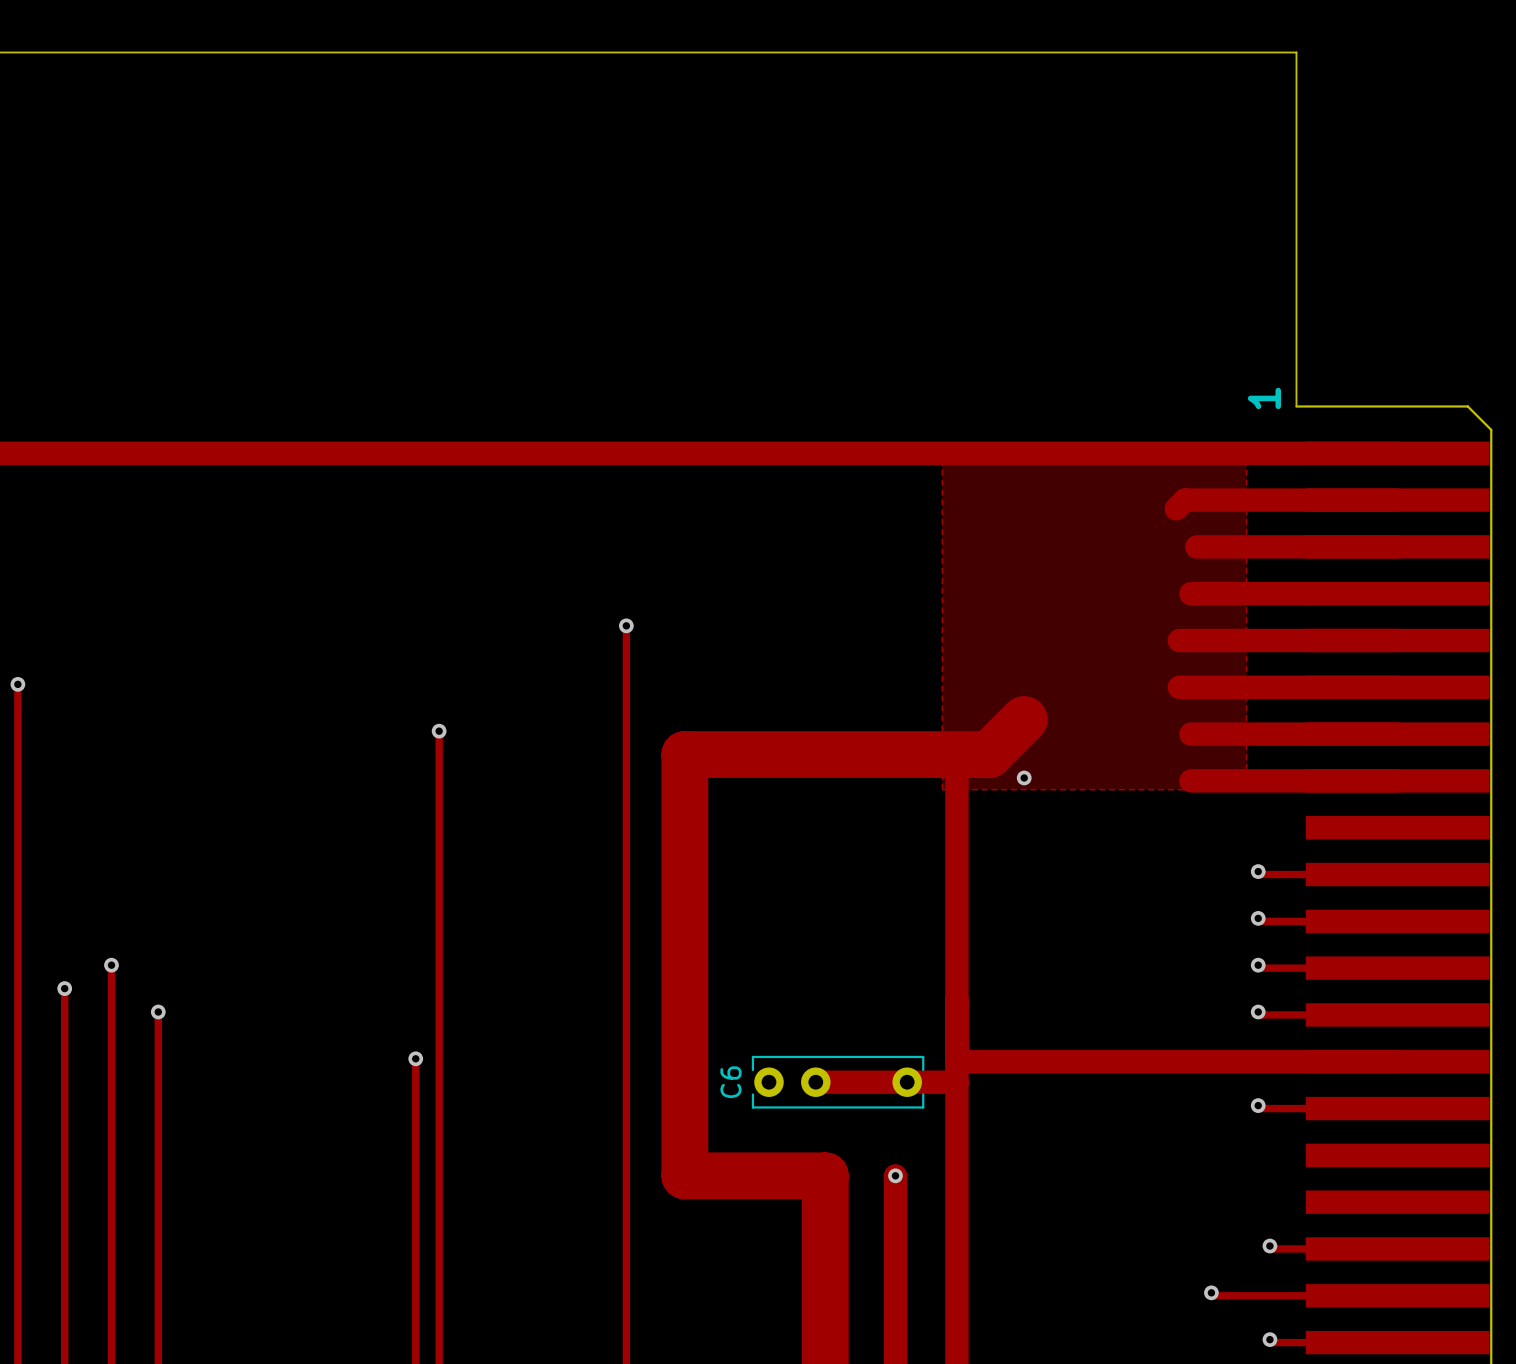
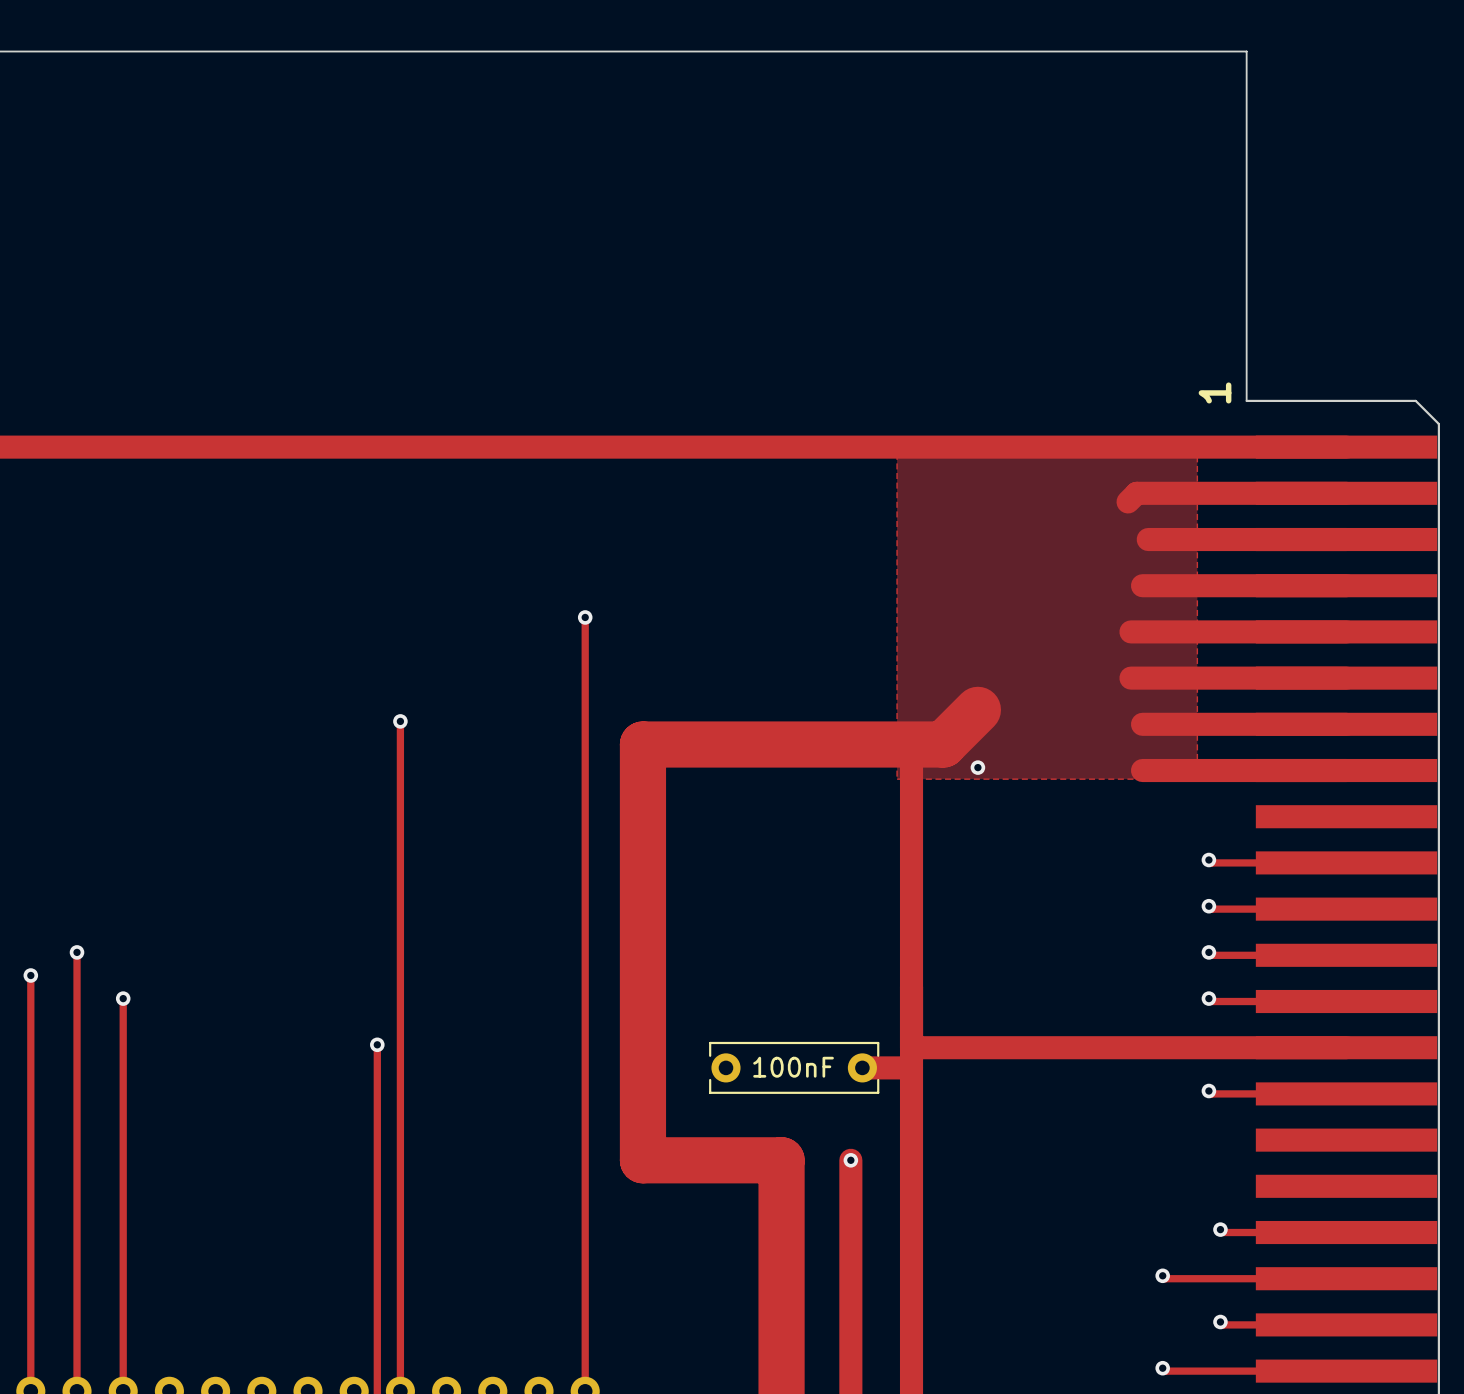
track: (815, 1082) (907, 1082) -> none
C6: (838, 1082) -> none
part: none -> 100nF (794, 1067)

